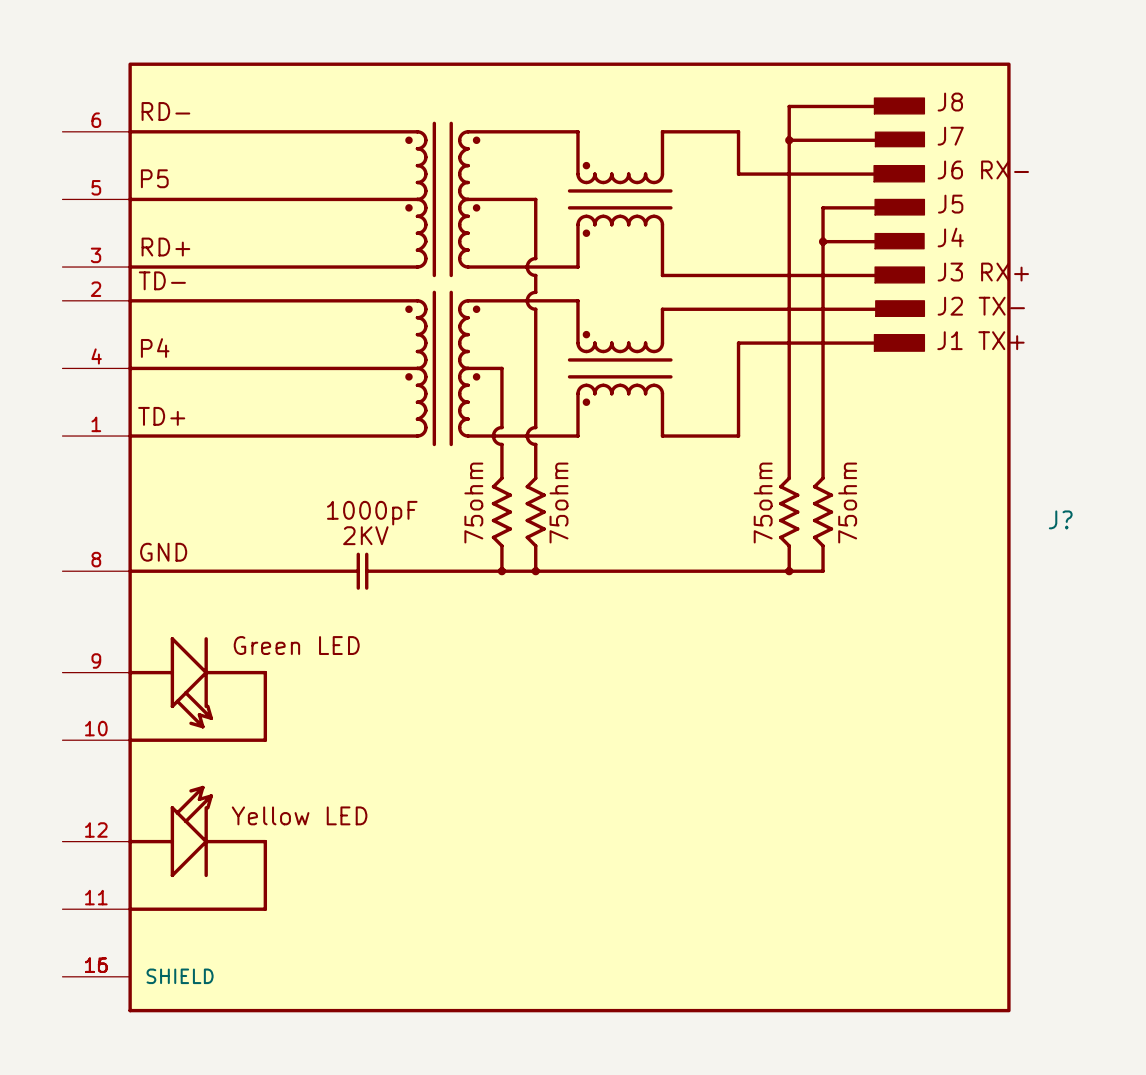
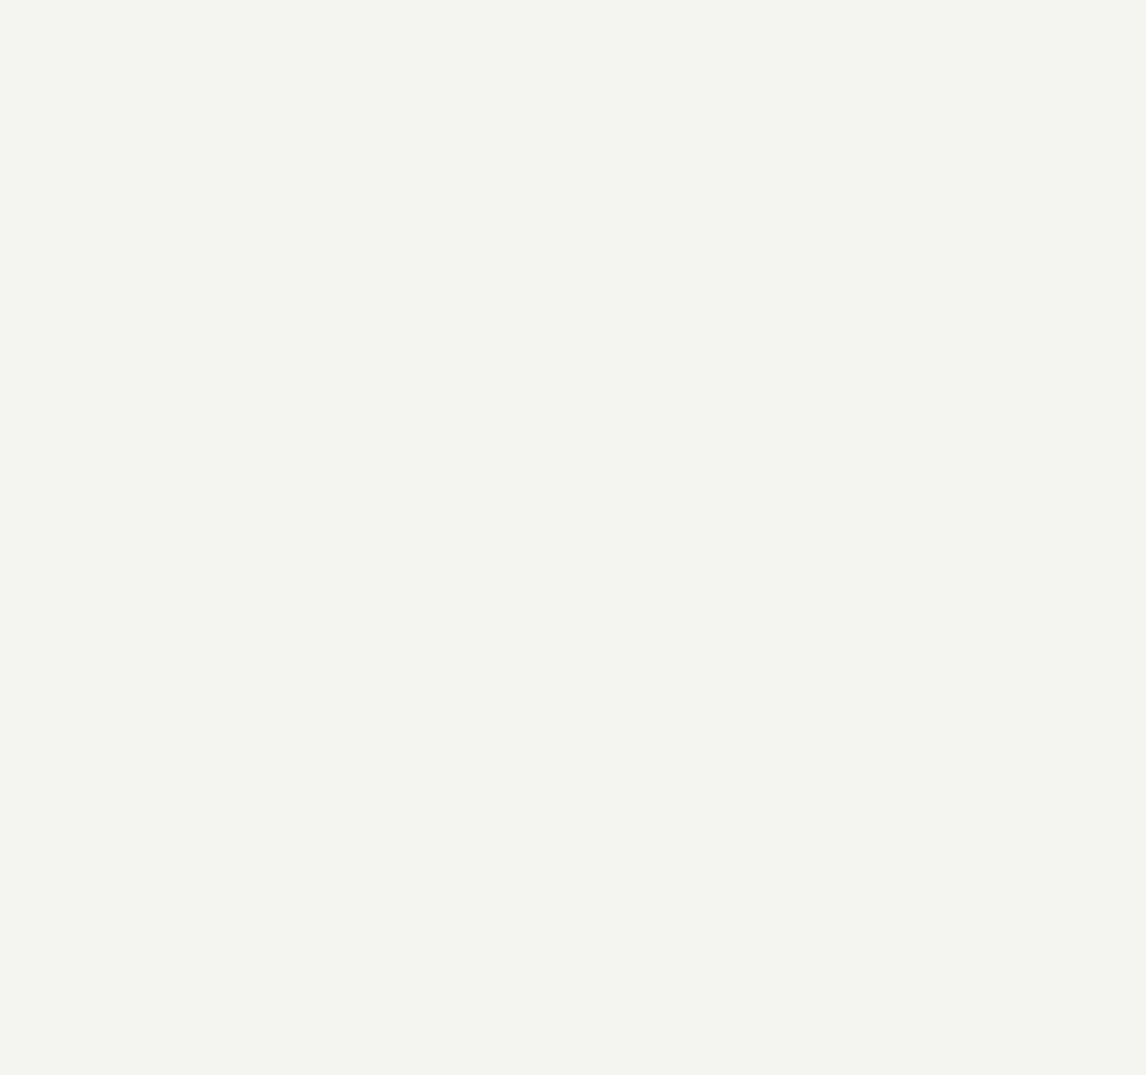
J?: (536, 537) -> none

